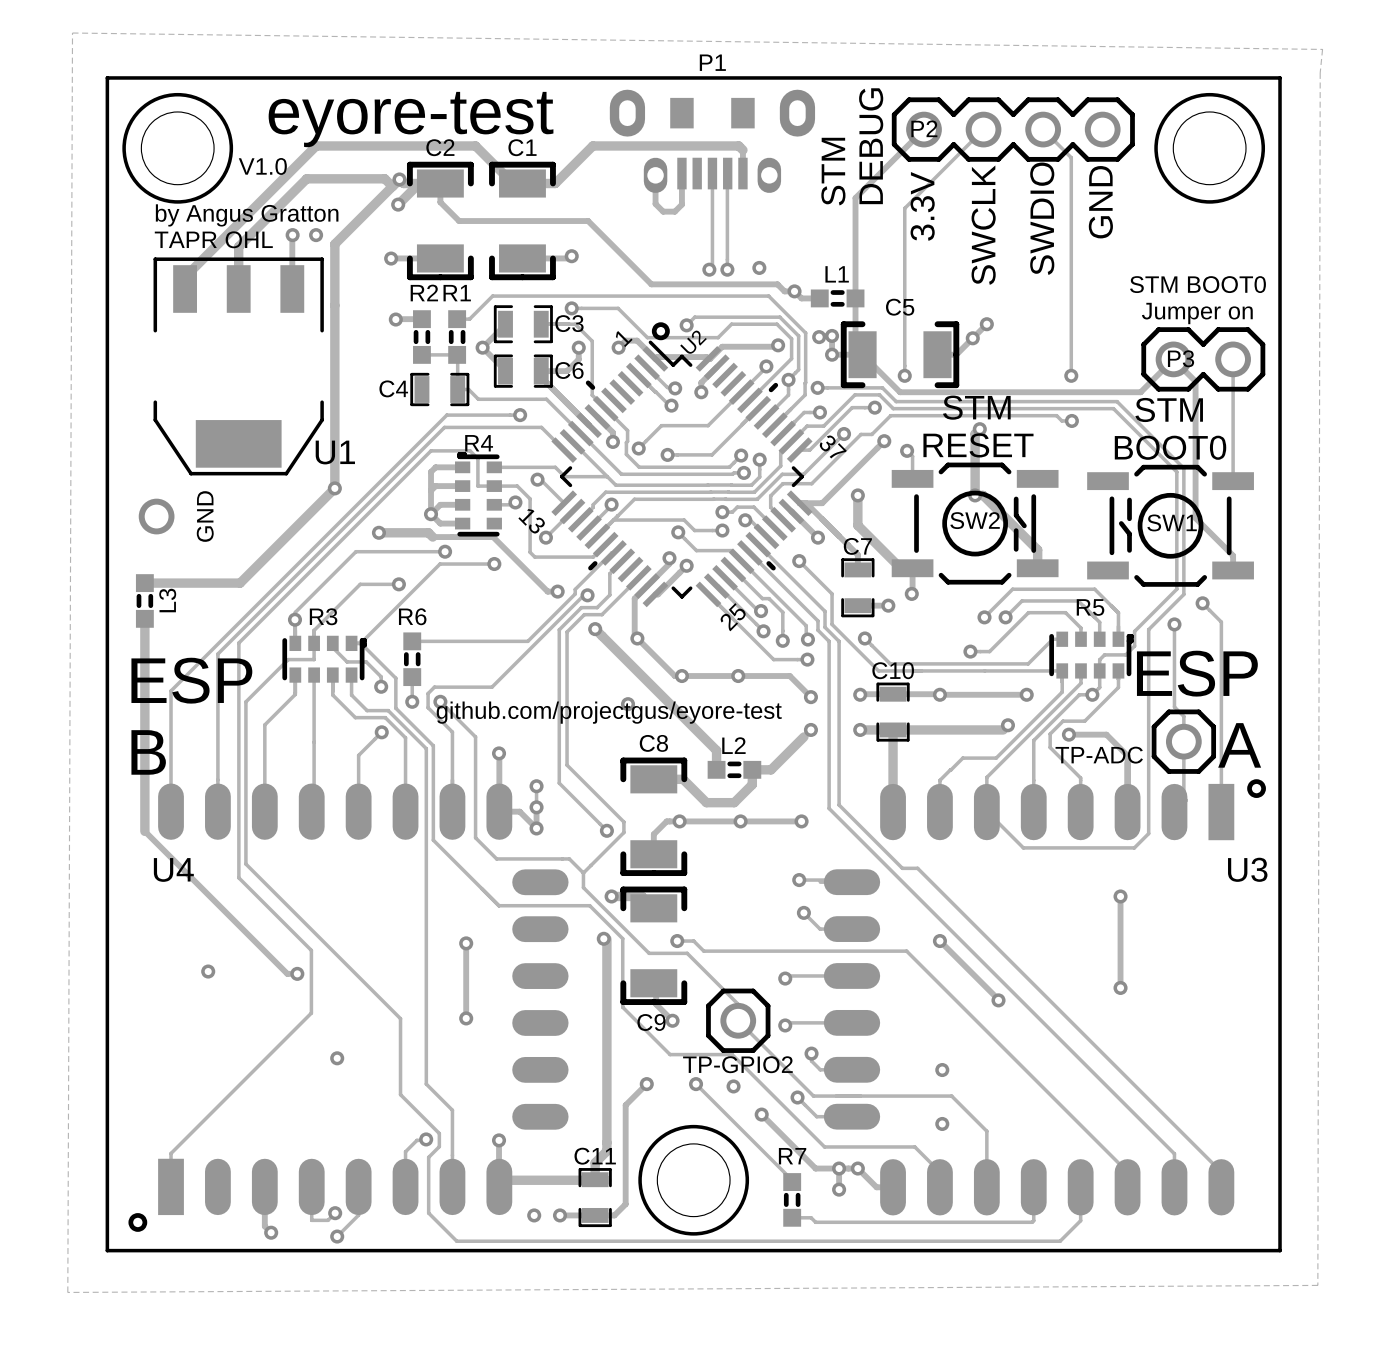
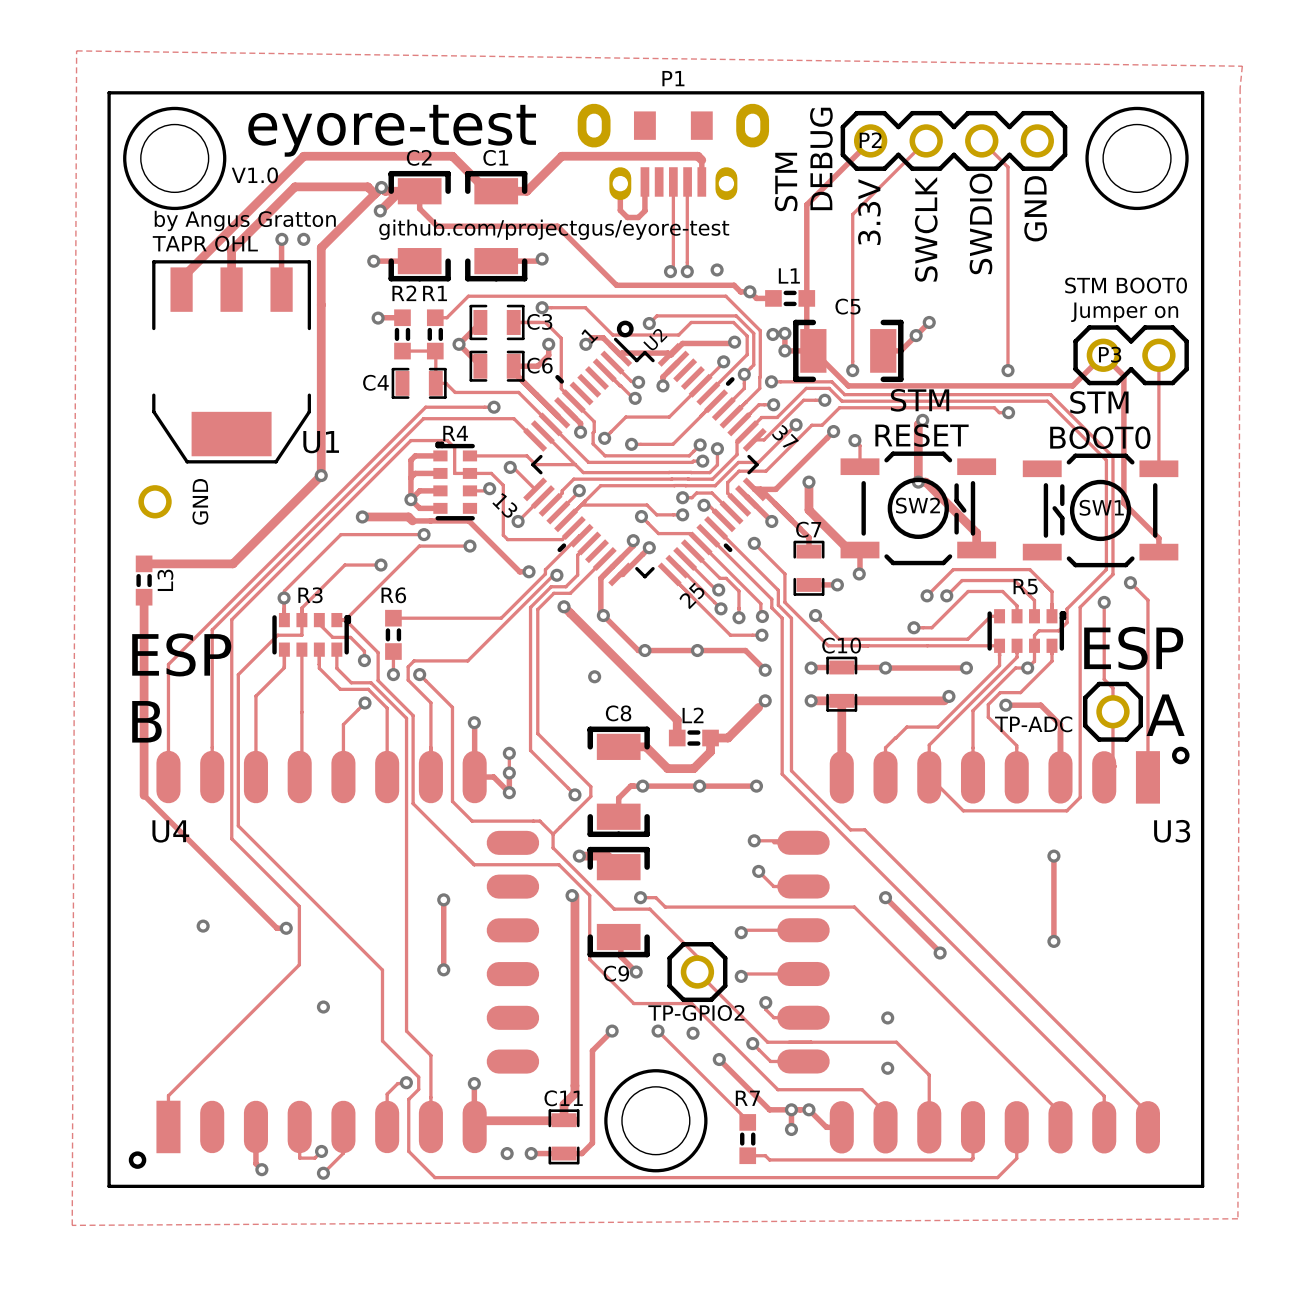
text position: github.com/projectgus/eyore-test (609, 712) -> github.com/projectgus/eyore-test (554, 229)

